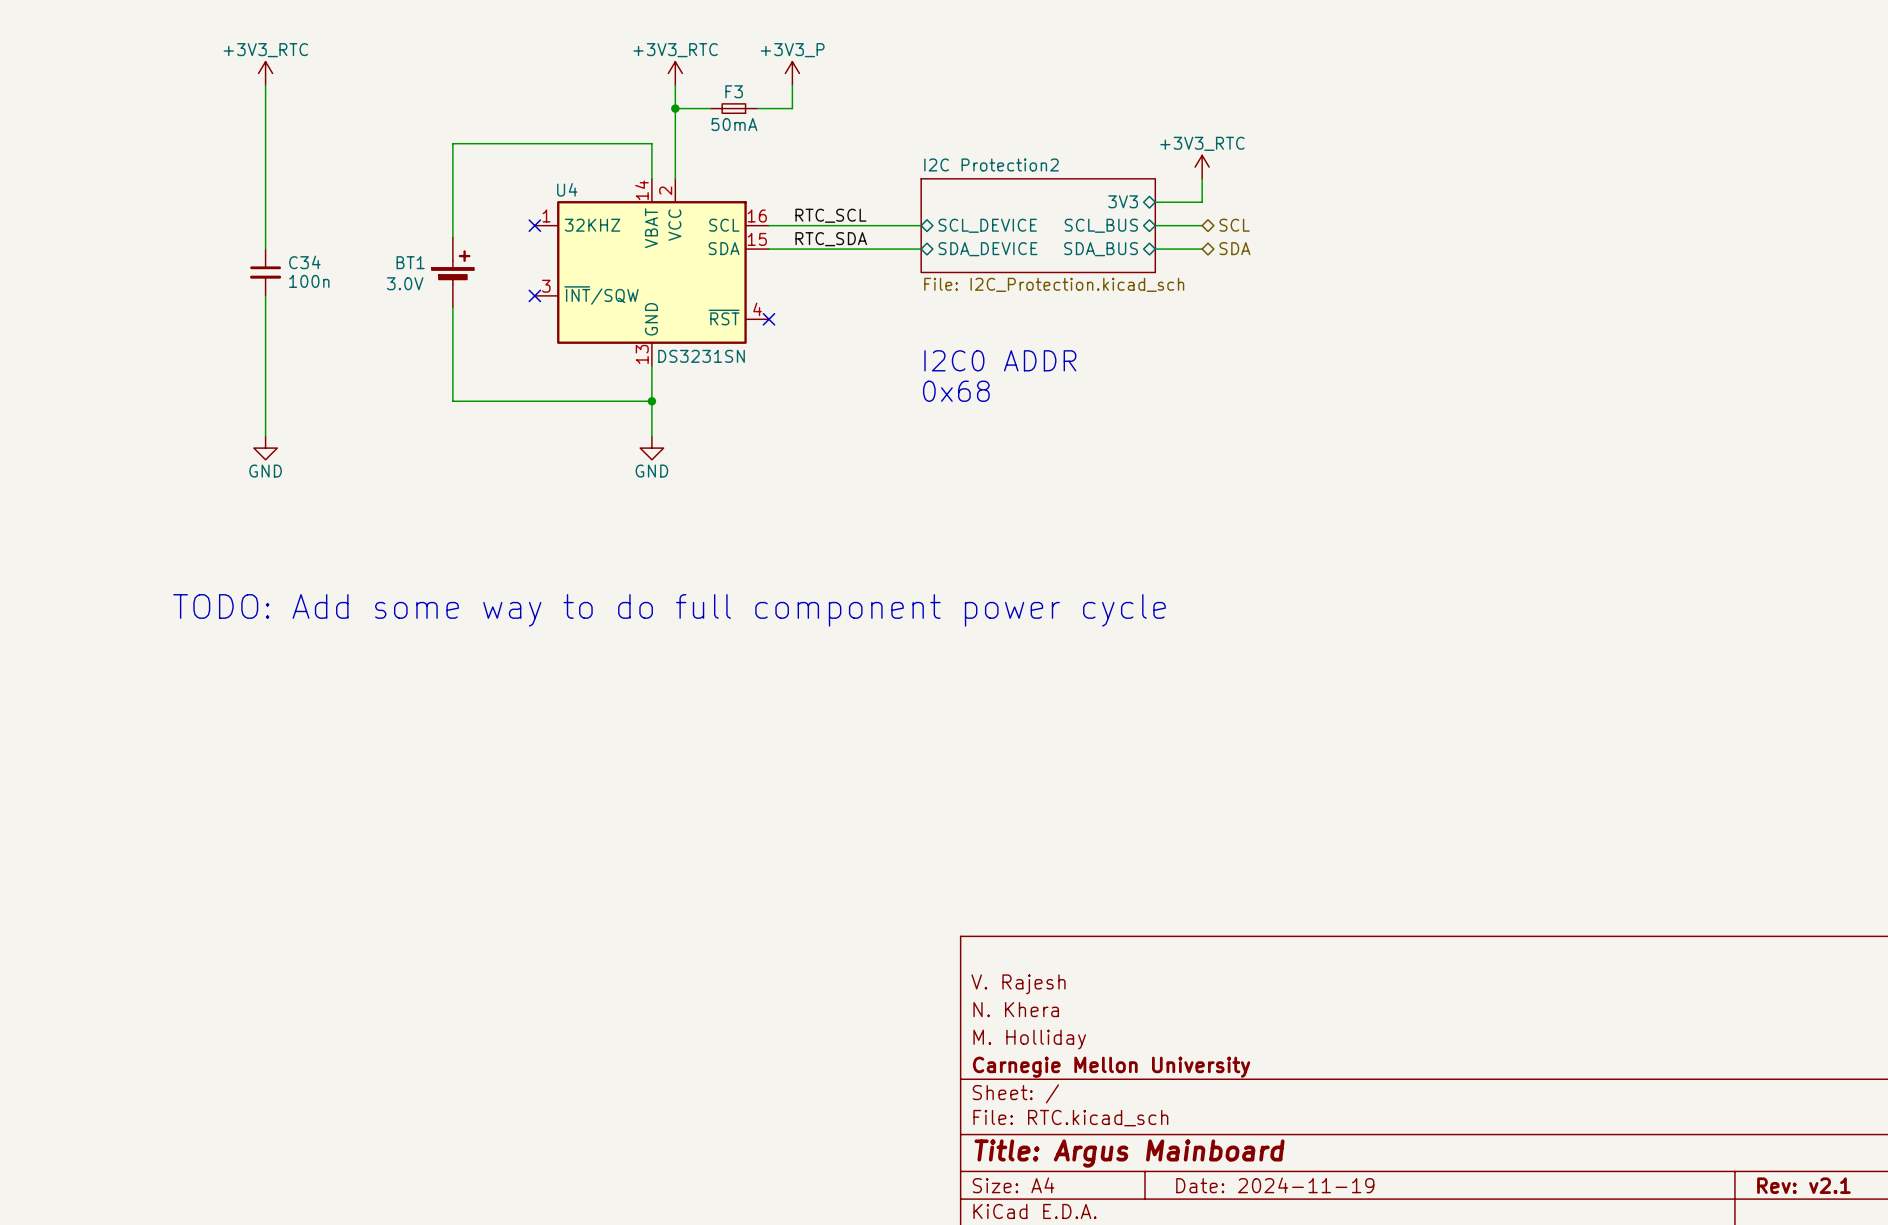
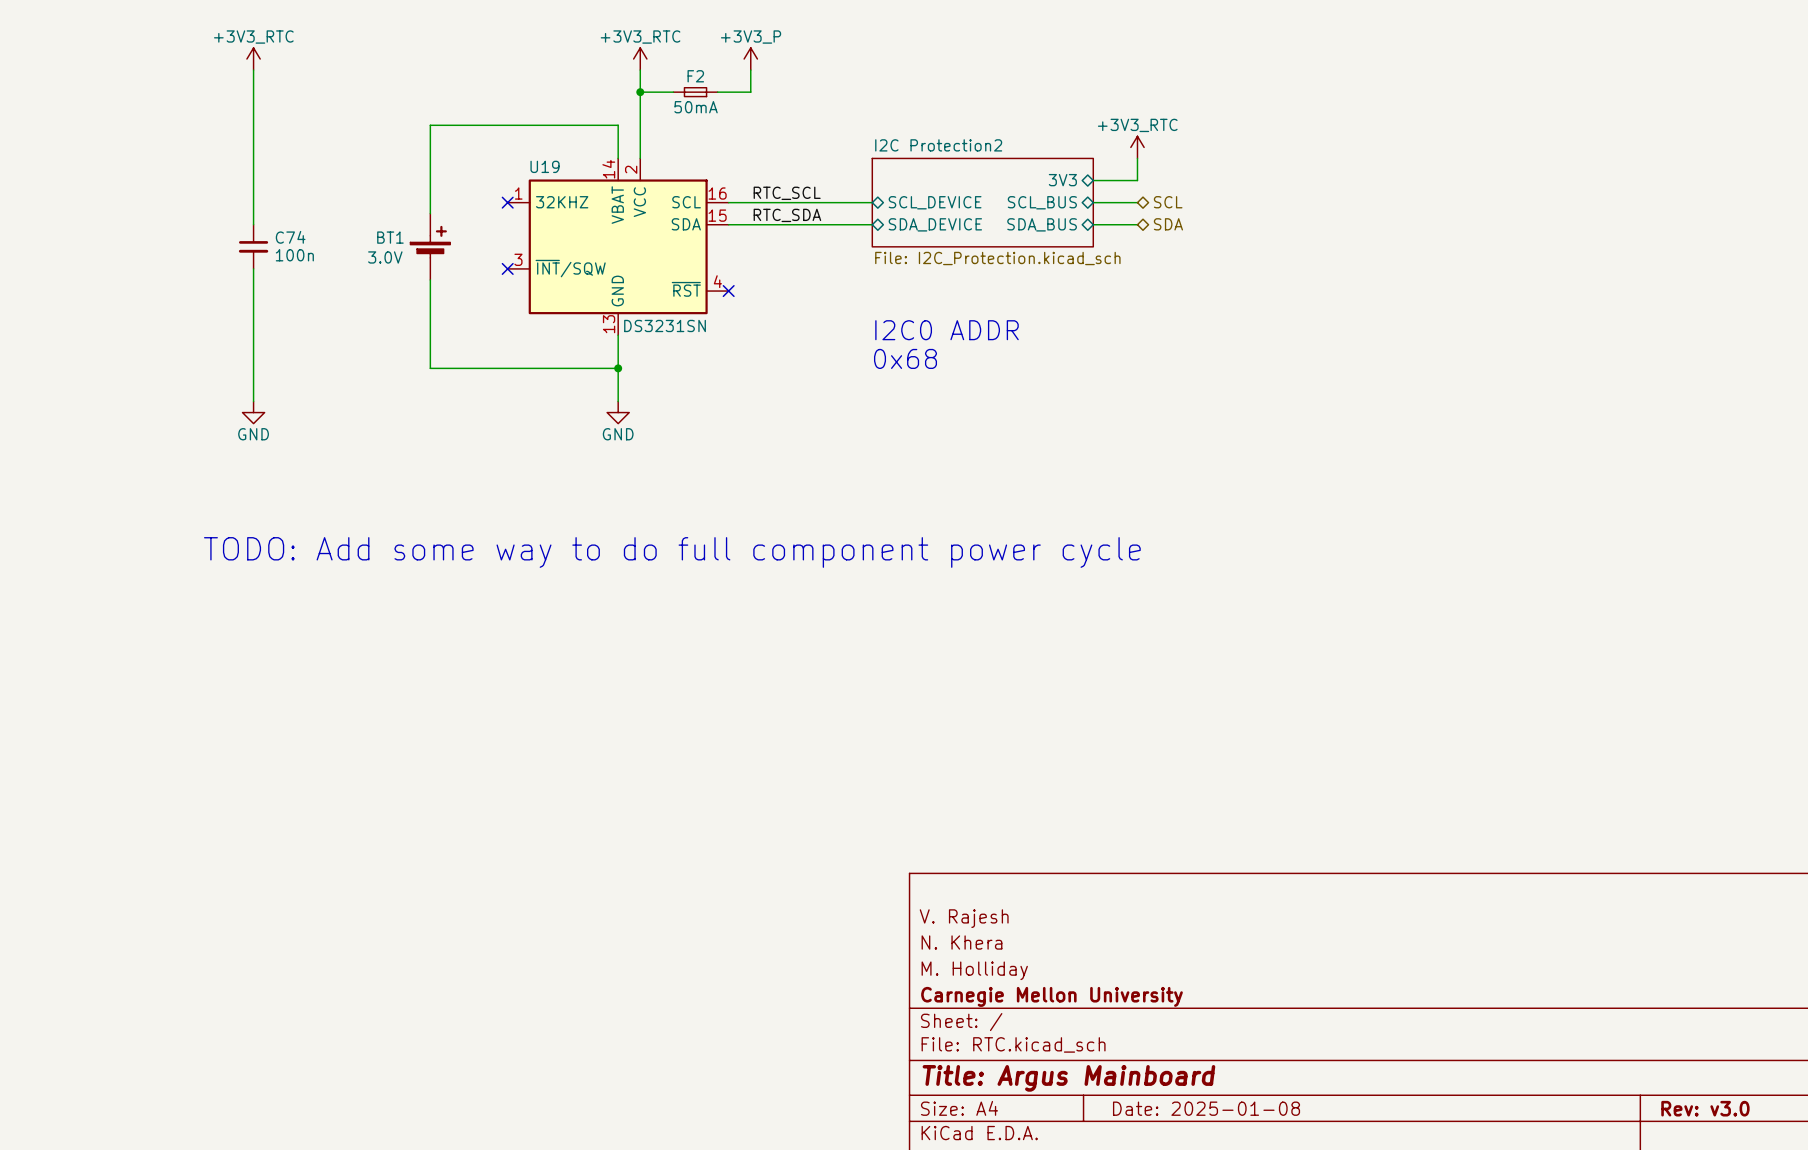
F3 name: F3 (734, 91) -> F2 (695, 76)
U4 name: U4 (567, 189) -> U19 (545, 166)
C34 name: C34 (304, 262) -> C74 (290, 237)
text position: TODO: Add some way to do full component power cycle (669, 610) -> TODO: Add some way to do full component power cycle (672, 552)
title block: Date: 2024-11-19 (1275, 1185) -> Date: 2025-01-08 (1206, 1108)
title block: Rev: v2.1 (1803, 1185) -> Rev: v3.0 (1705, 1108)

